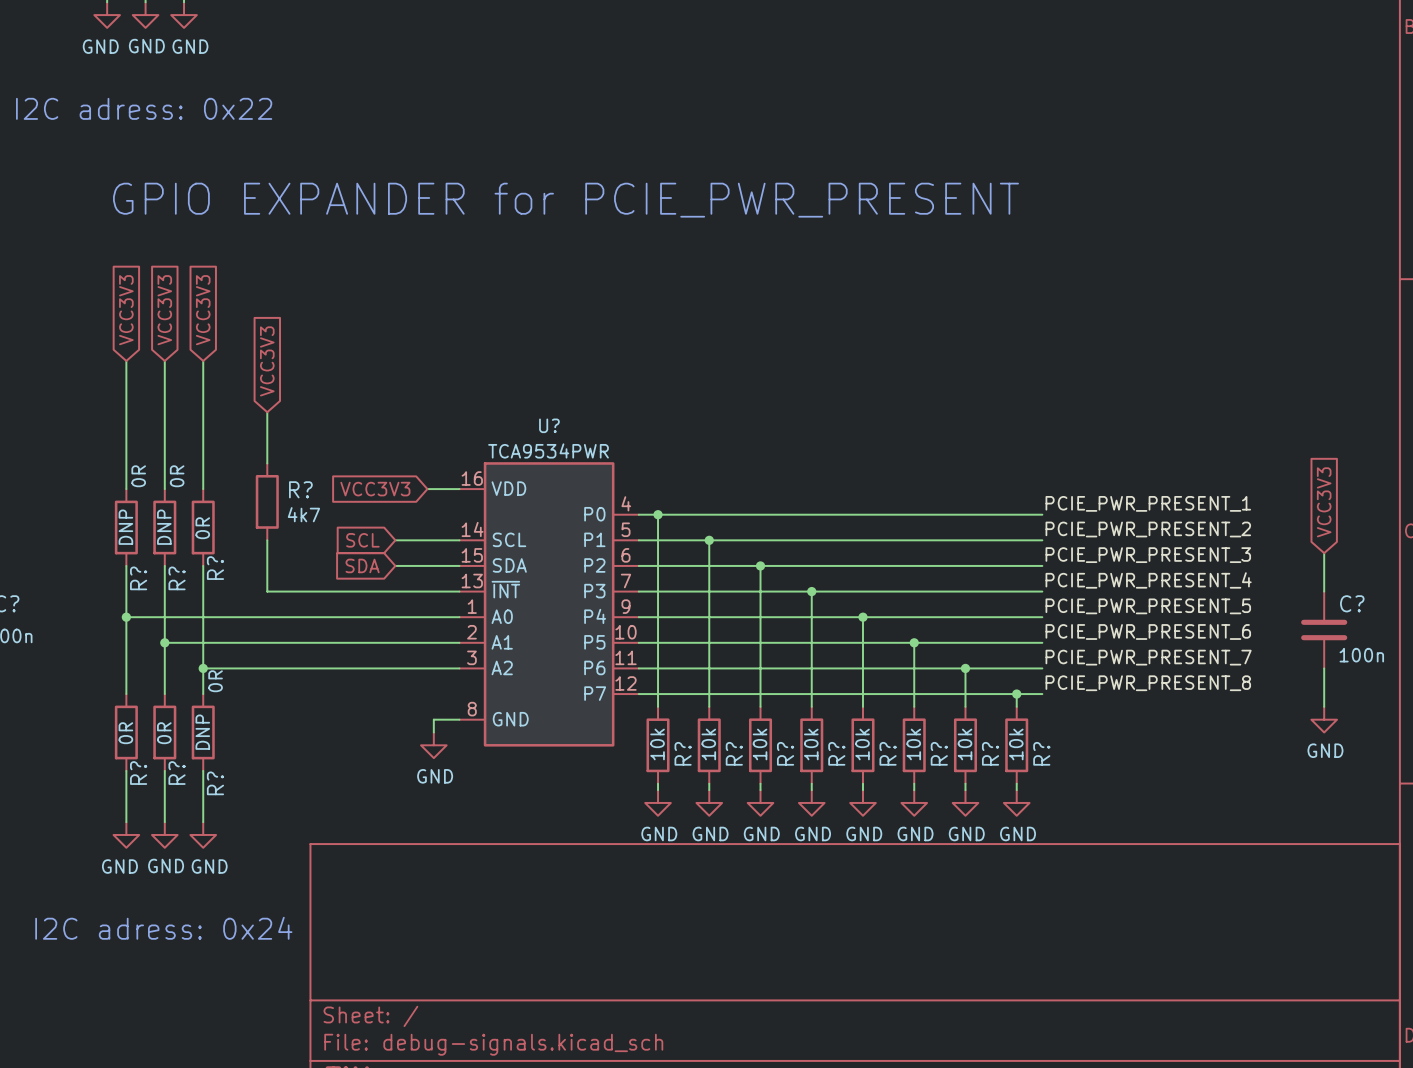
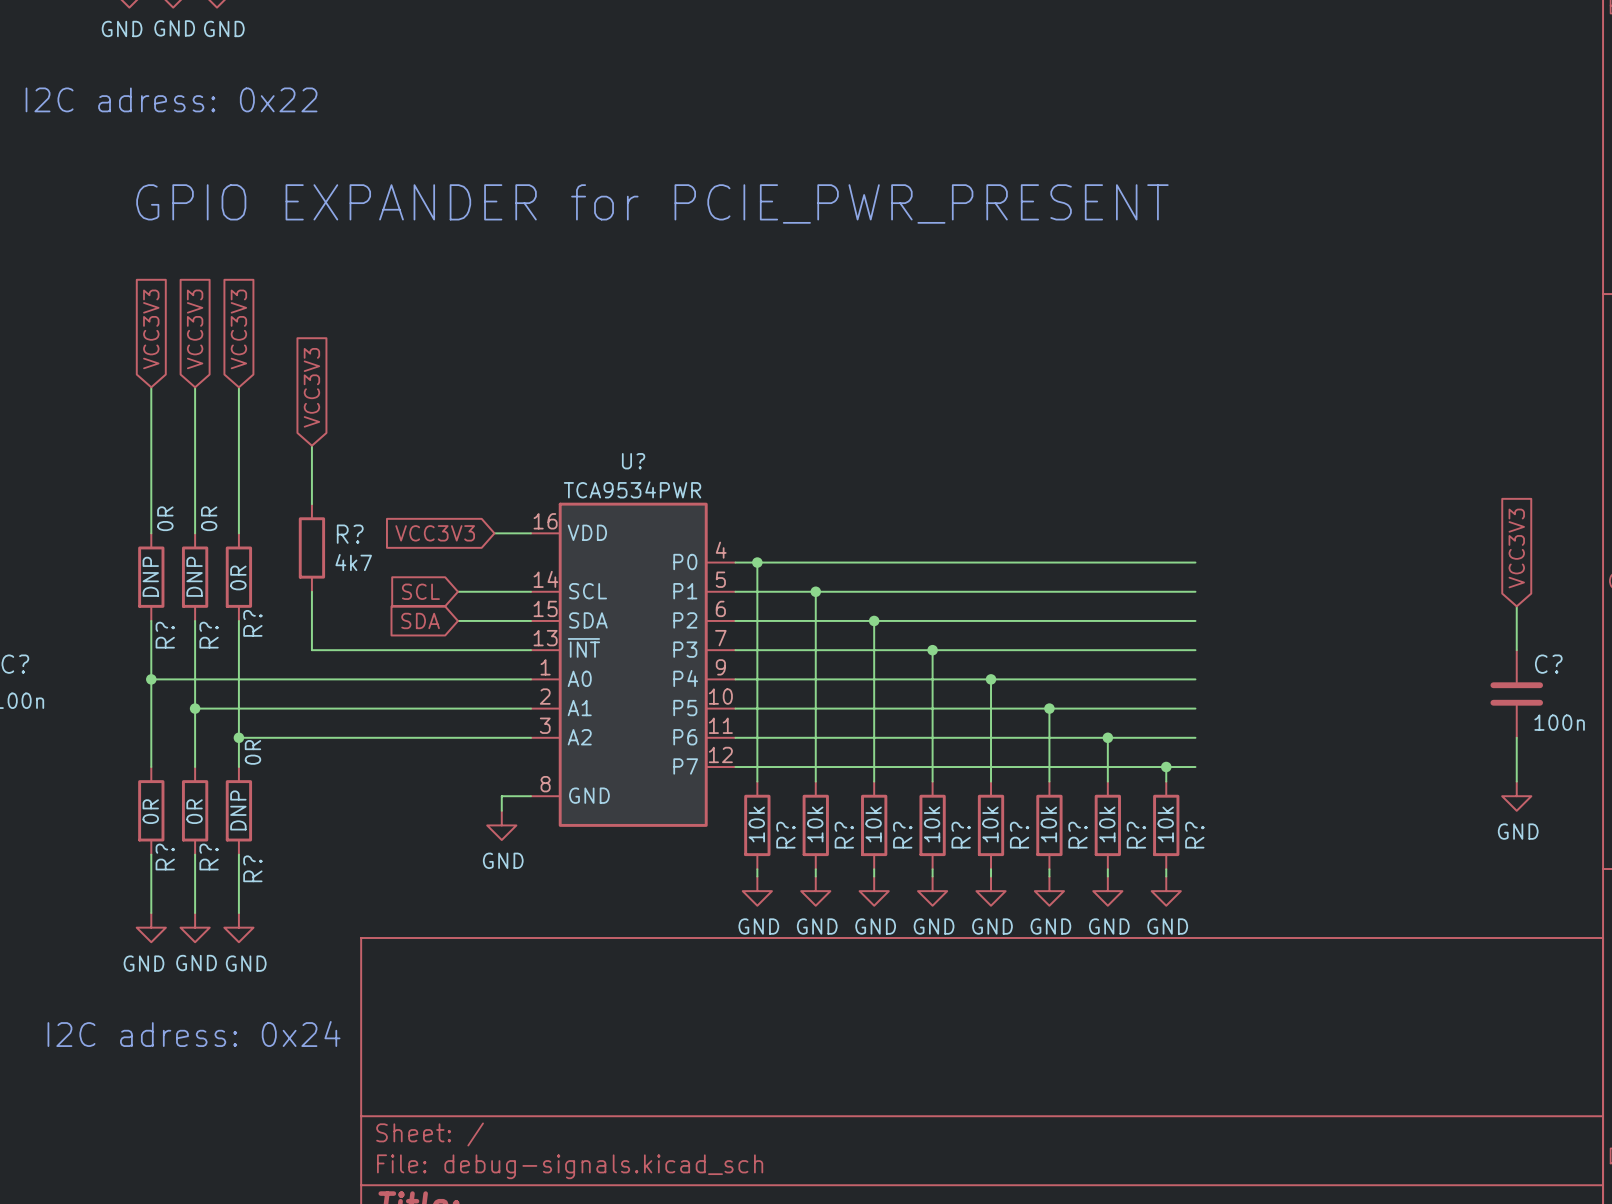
label: PCIE_PWR_PRESENT_1 (1148, 503) -> none
label: PCIE_PWR_PRESENT_2 (1148, 529) -> none
label: PCIE_PWR_PRESENT_3 (1148, 555) -> none
label: PCIE_PWR_PRESENT_4 (1148, 580) -> none
label: PCIE_PWR_PRESENT_5 (1148, 606) -> none
label: PCIE_PWR_PRESENT_6 (1148, 631) -> none
label: PCIE_PWR_PRESENT_7 (1148, 657) -> none
label: PCIE_PWR_PRESENT_8 (1148, 683) -> none

